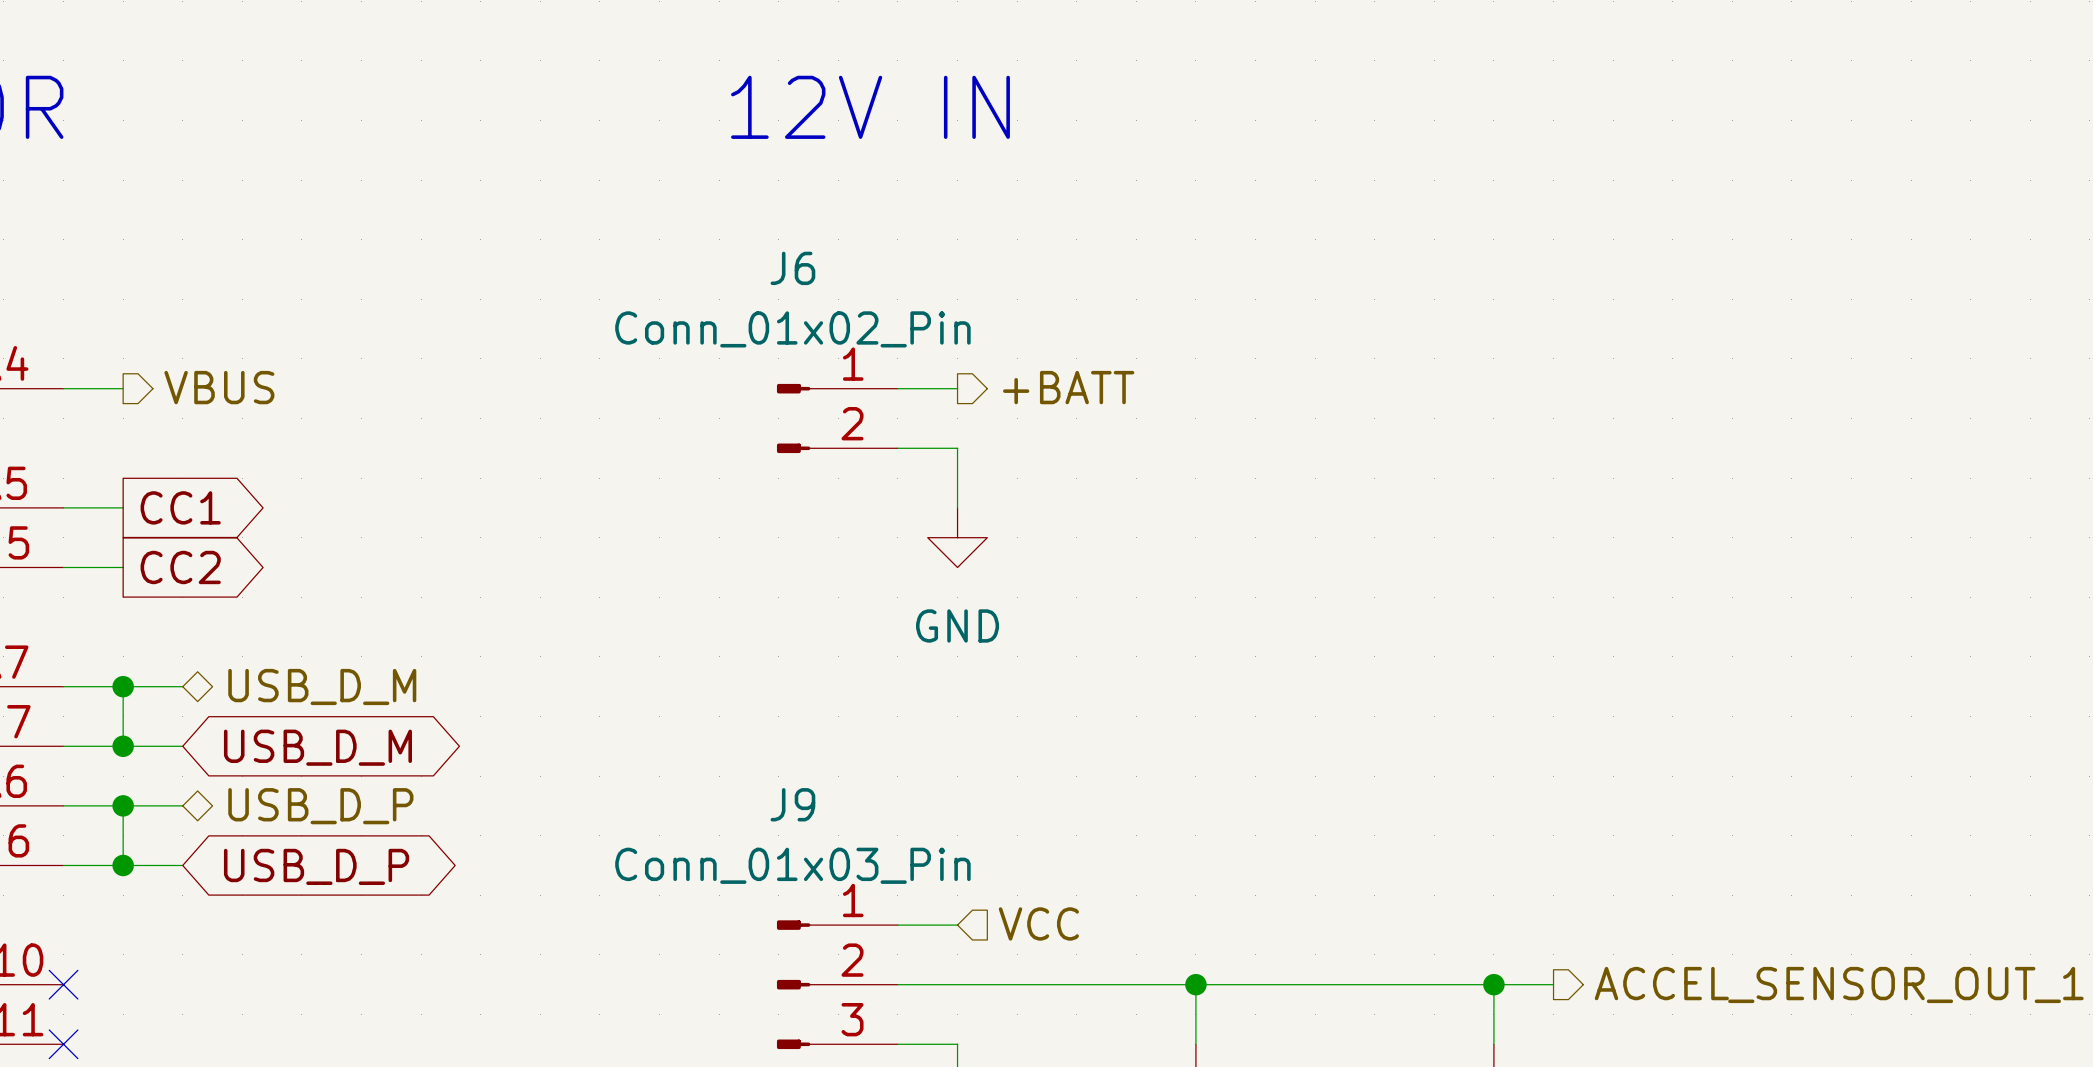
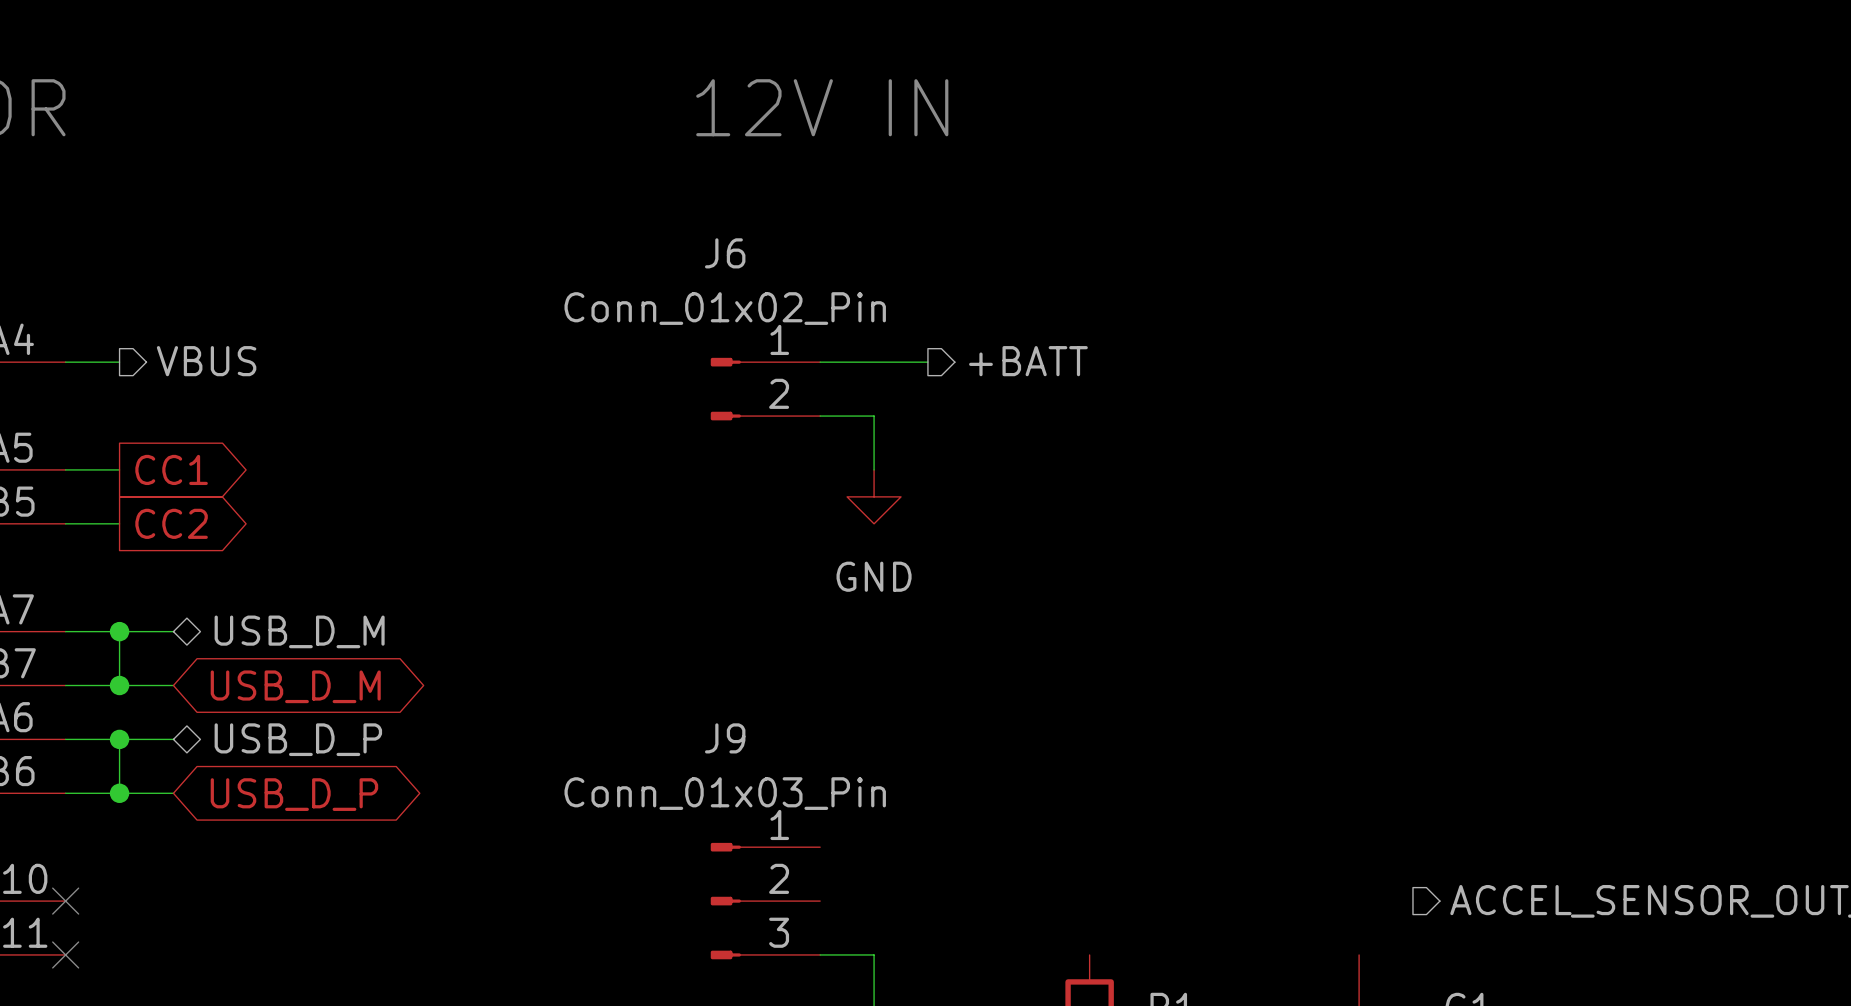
text position: 12V IN (870, 107) -> 12V IN (822, 107)
hierarchical label position: +BATT (1068, 387) -> +BATT (1028, 361)
hierarchical label: VCC (1038, 923) -> none
wire: (897, 925) (957, 925) -> (874, 362) (927, 362)
wire: (897, 984) (1553, 984) -> none
wire: (1195, 984) (1195, 1044) -> none
junction: (1195, 984) -> none
wire: (1493, 984) (1493, 1044) -> none
junction: (1493, 984) -> none

